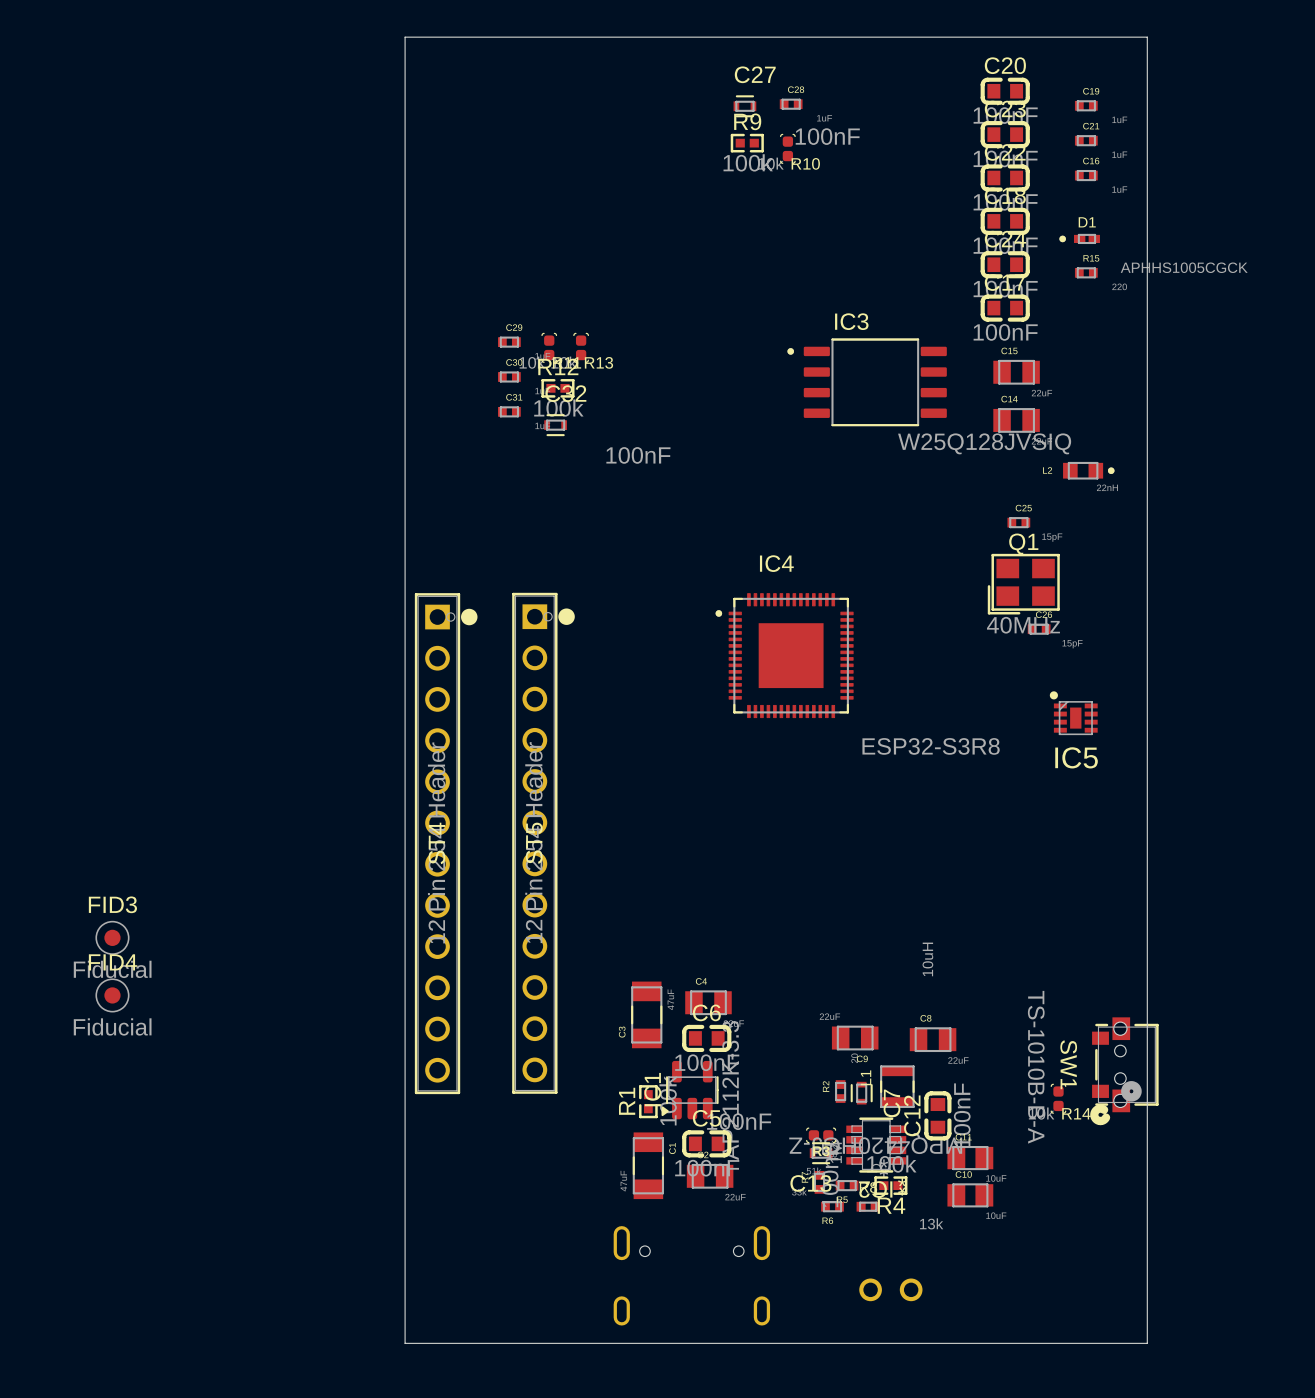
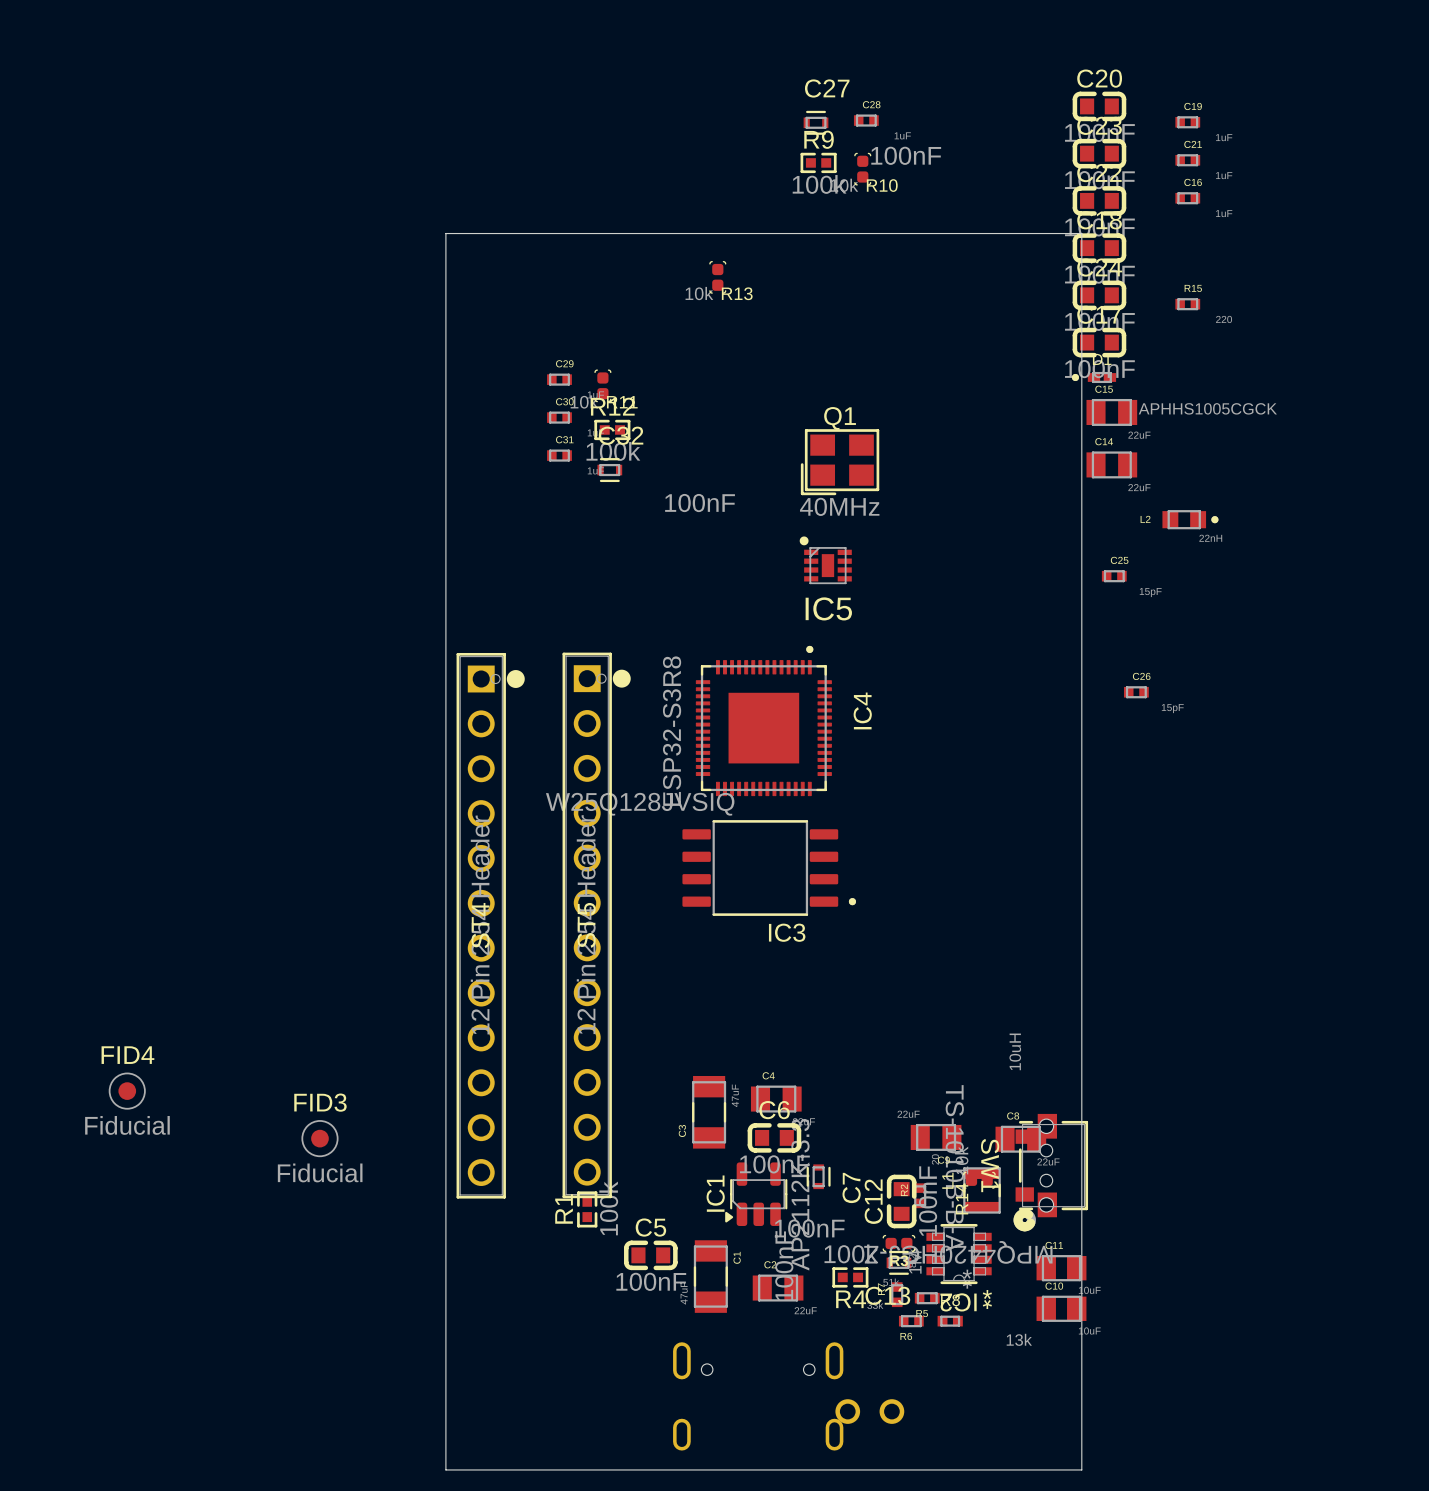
board edge: (405, 207) (405, 37) (1147, 37) (1147, 1343) (989, 1343) -> (445, 233) (1081, 233) (1081, 1469)
D1 position: (1079, 238) -> (1093, 377)
R13 position: (581, 347) -> (717, 277)
IC3 rotation: 0° (867, 382) -> 180° (769, 868)
IC3 position: (867, 382) -> (769, 868)
Q1 position: (1023, 584) -> (840, 462)
IC4 rotation: 0° (784, 655) -> 90° clockwise (763, 721)
IC4 position: (784, 655) -> (763, 721)
IC5 position: (1073, 713) -> (825, 560)
IC4 value position: ESP32-S3R8 (931, 746) -> ESP32-S3R8 (672, 731)
FID3 position: (112, 937) -> (319, 1138)
SW1 footprint: [1090, 1017, 1159, 1126] -> [1013, 1113, 1089, 1232]
C7 position: (861, 1093) -> (818, 1176)
R14 rotation: 0° (1058, 1098) -> 90° clockwise (979, 1180)
R14 position: (1058, 1098) -> (979, 1180)
R1 position: (648, 1101) -> (587, 1209)
C12 position: (937, 1115) -> (901, 1201)
C5 position: (706, 1143) -> (650, 1255)
R4 position: (890, 1185) -> (850, 1277)
part position: (890, 1289) -> (869, 1411)

